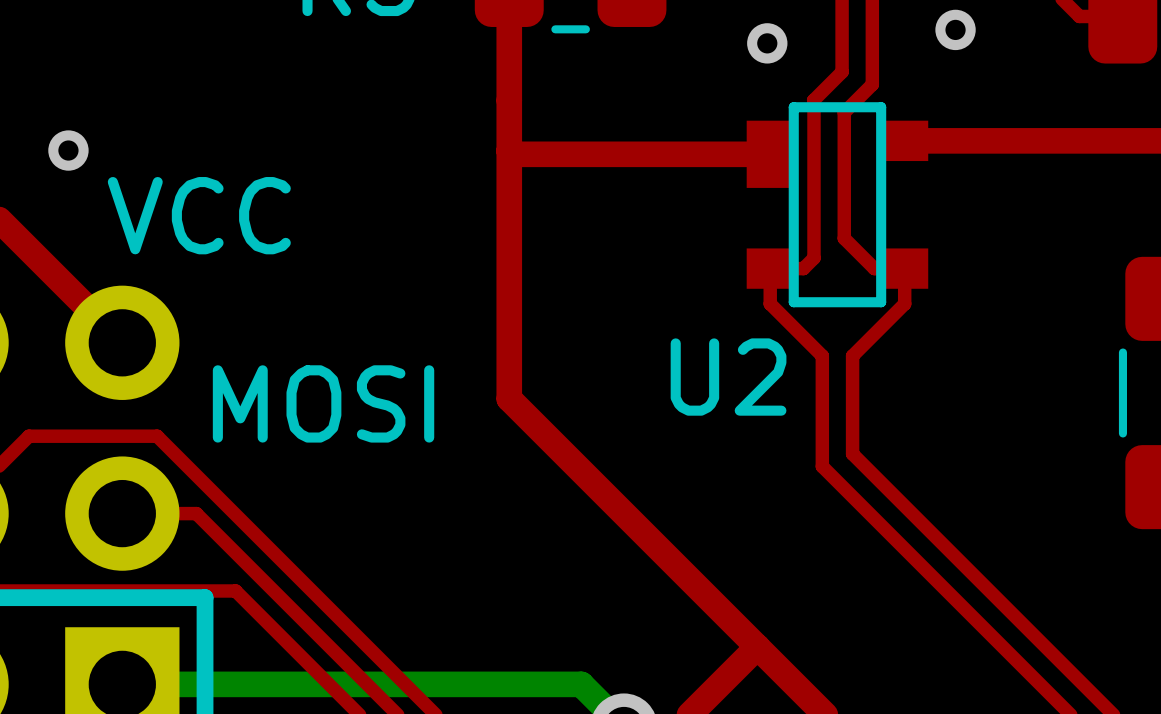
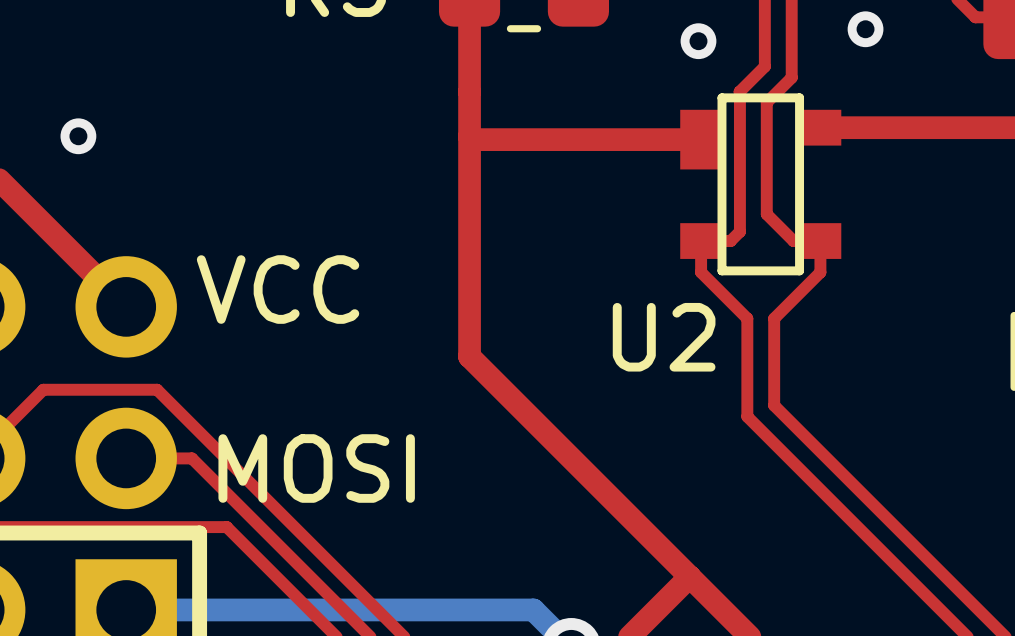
part text position: VCC (199, 215) -> VCC (278, 289)
part text position: MOSI (323, 403) -> MOSI (316, 468)

